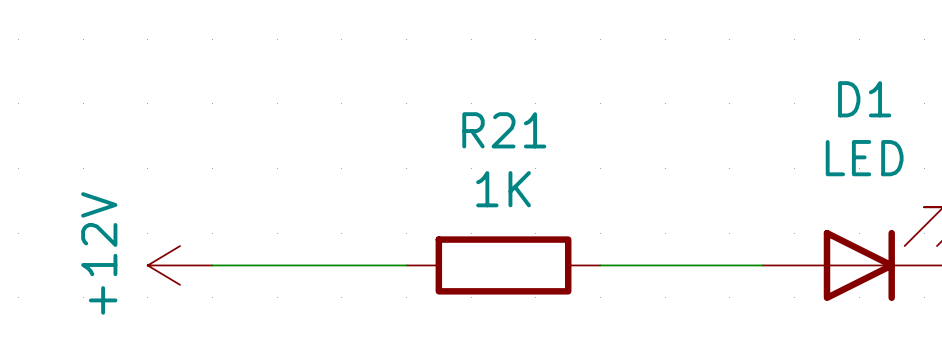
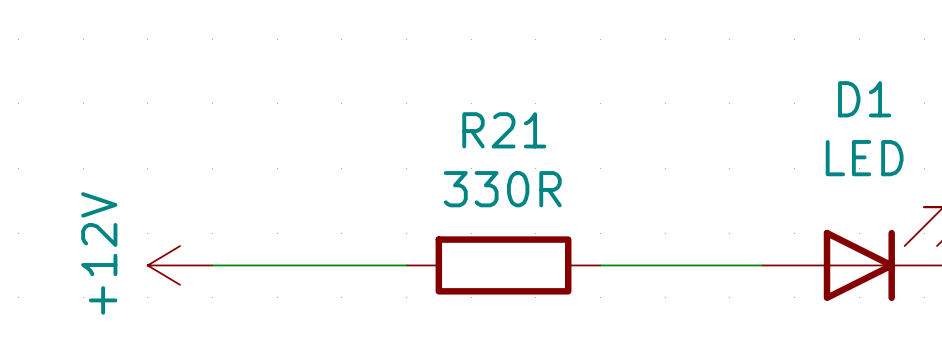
R21 value: 1K (503, 189) -> 330R (502, 189)

